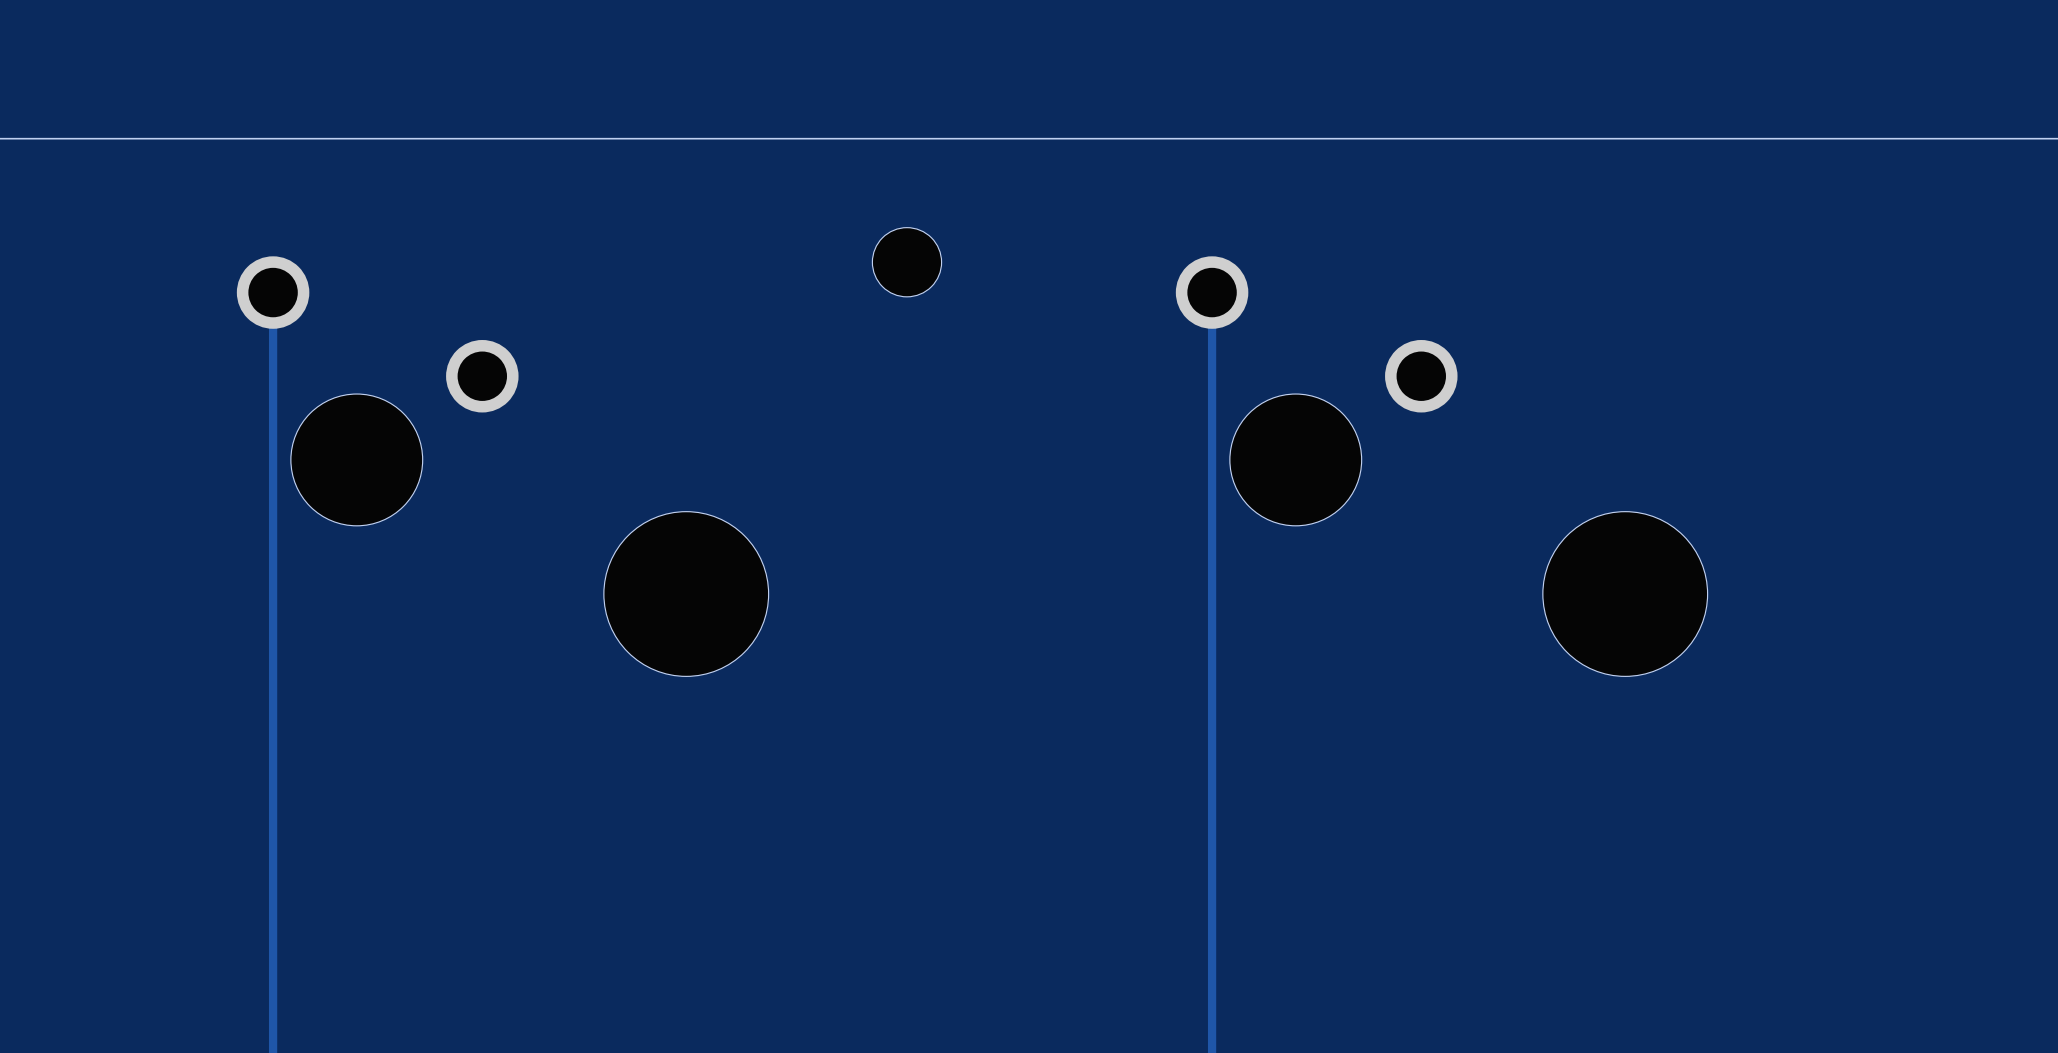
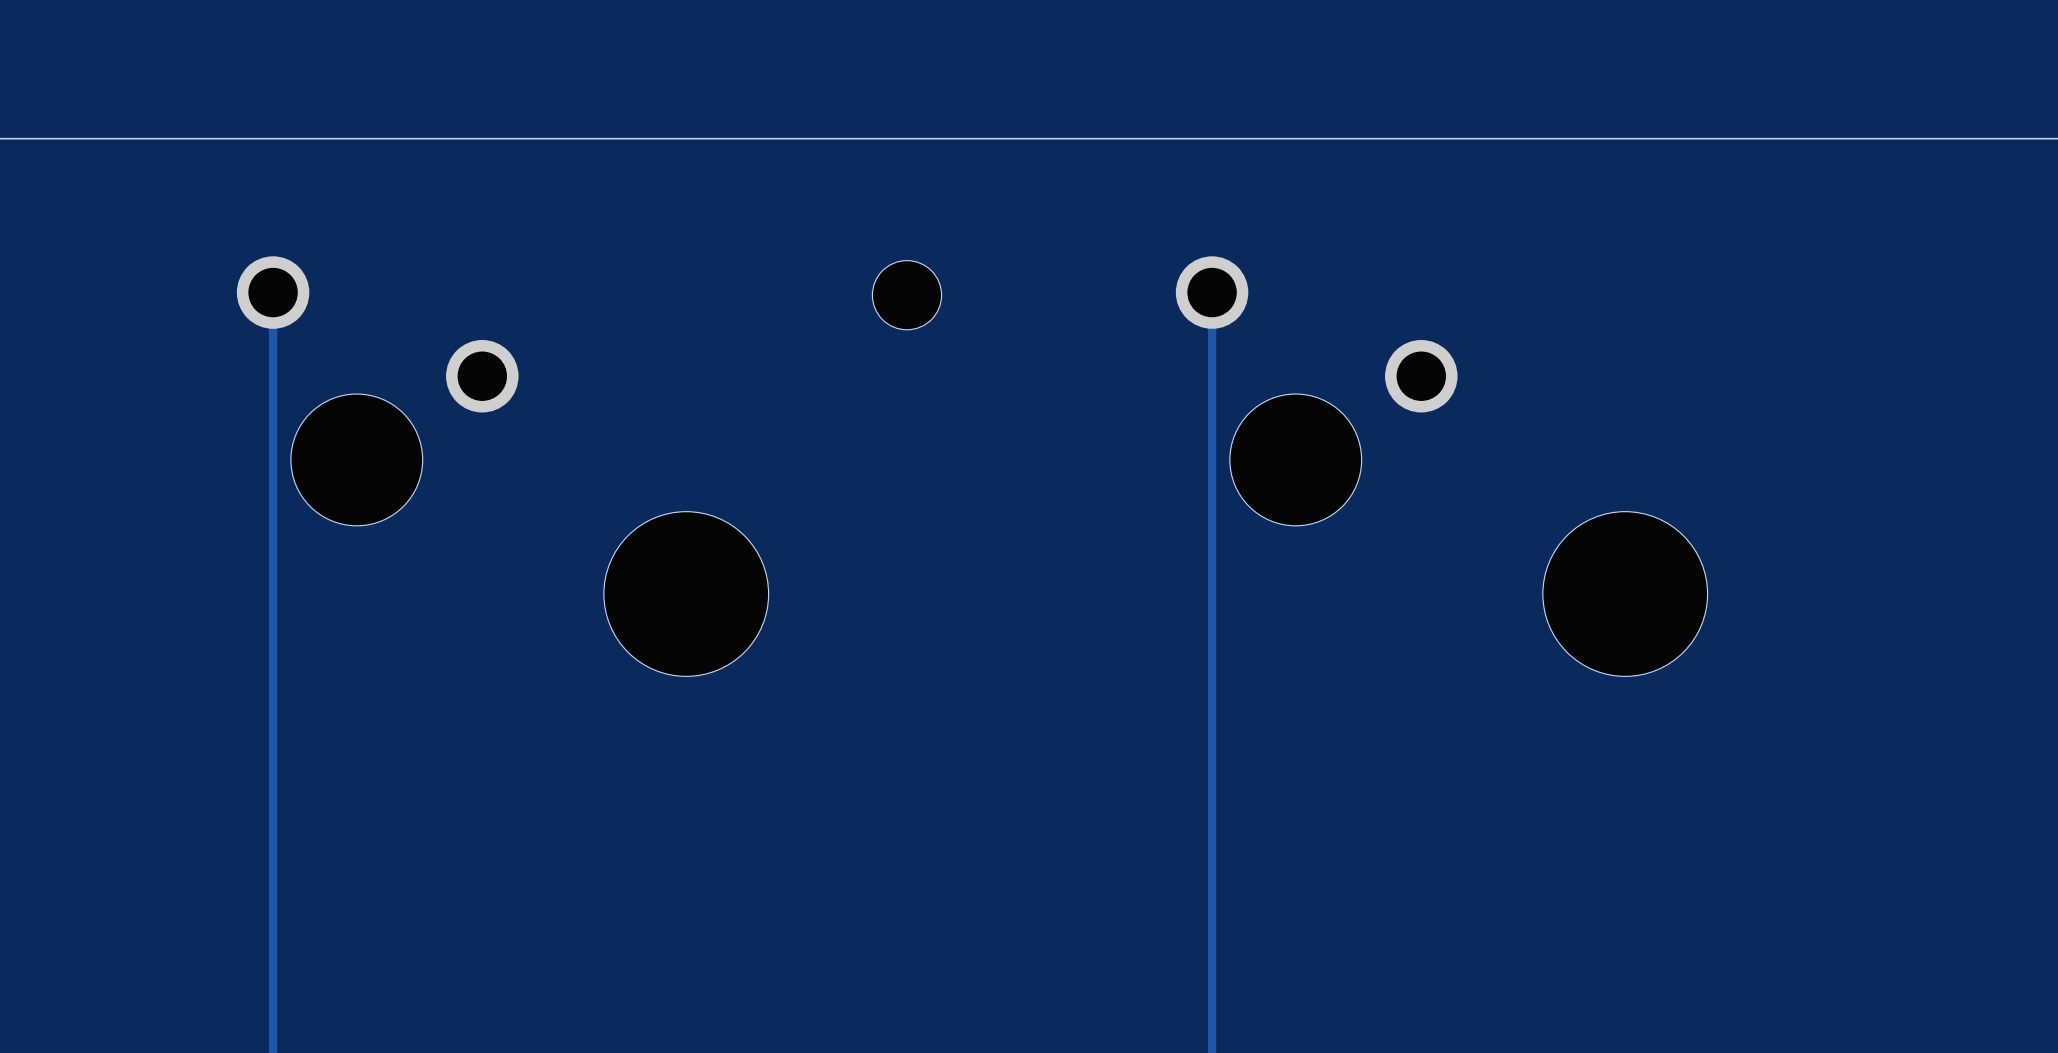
part position: (906, 262) -> (906, 295)

